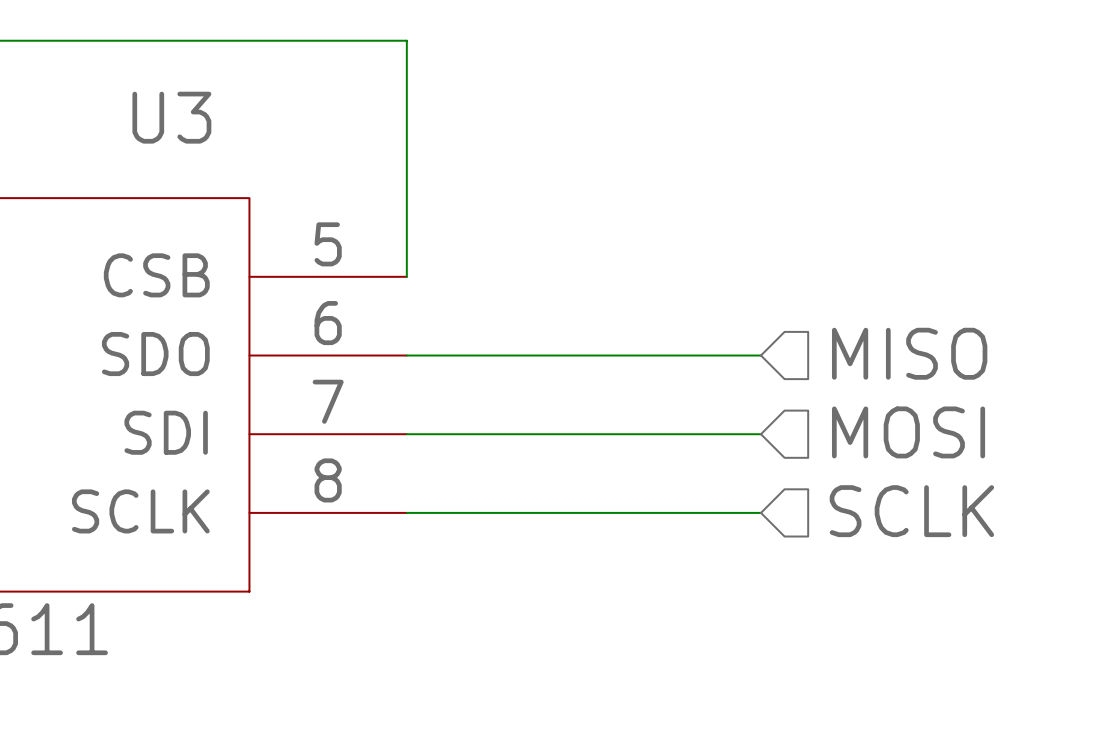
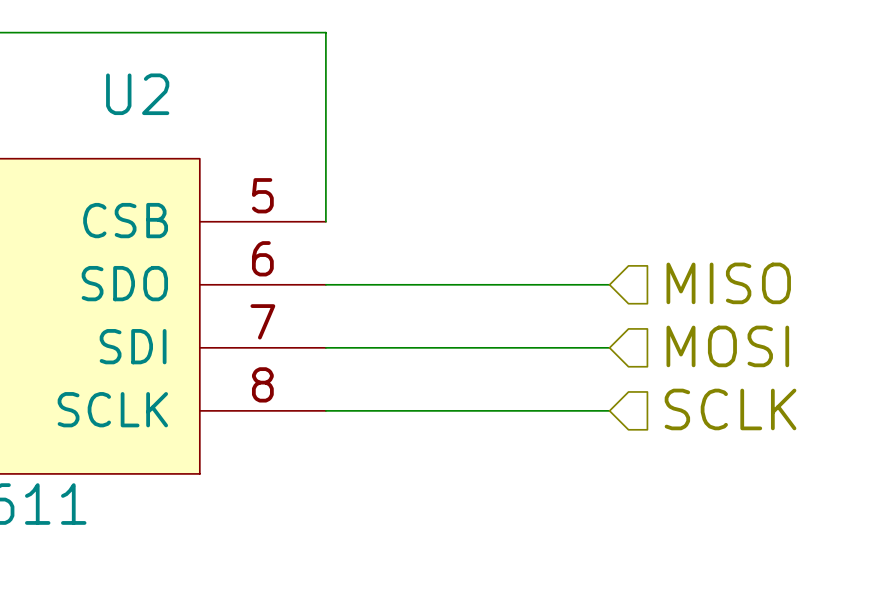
U3 name: U3 (171, 117) -> U2 (137, 94)

